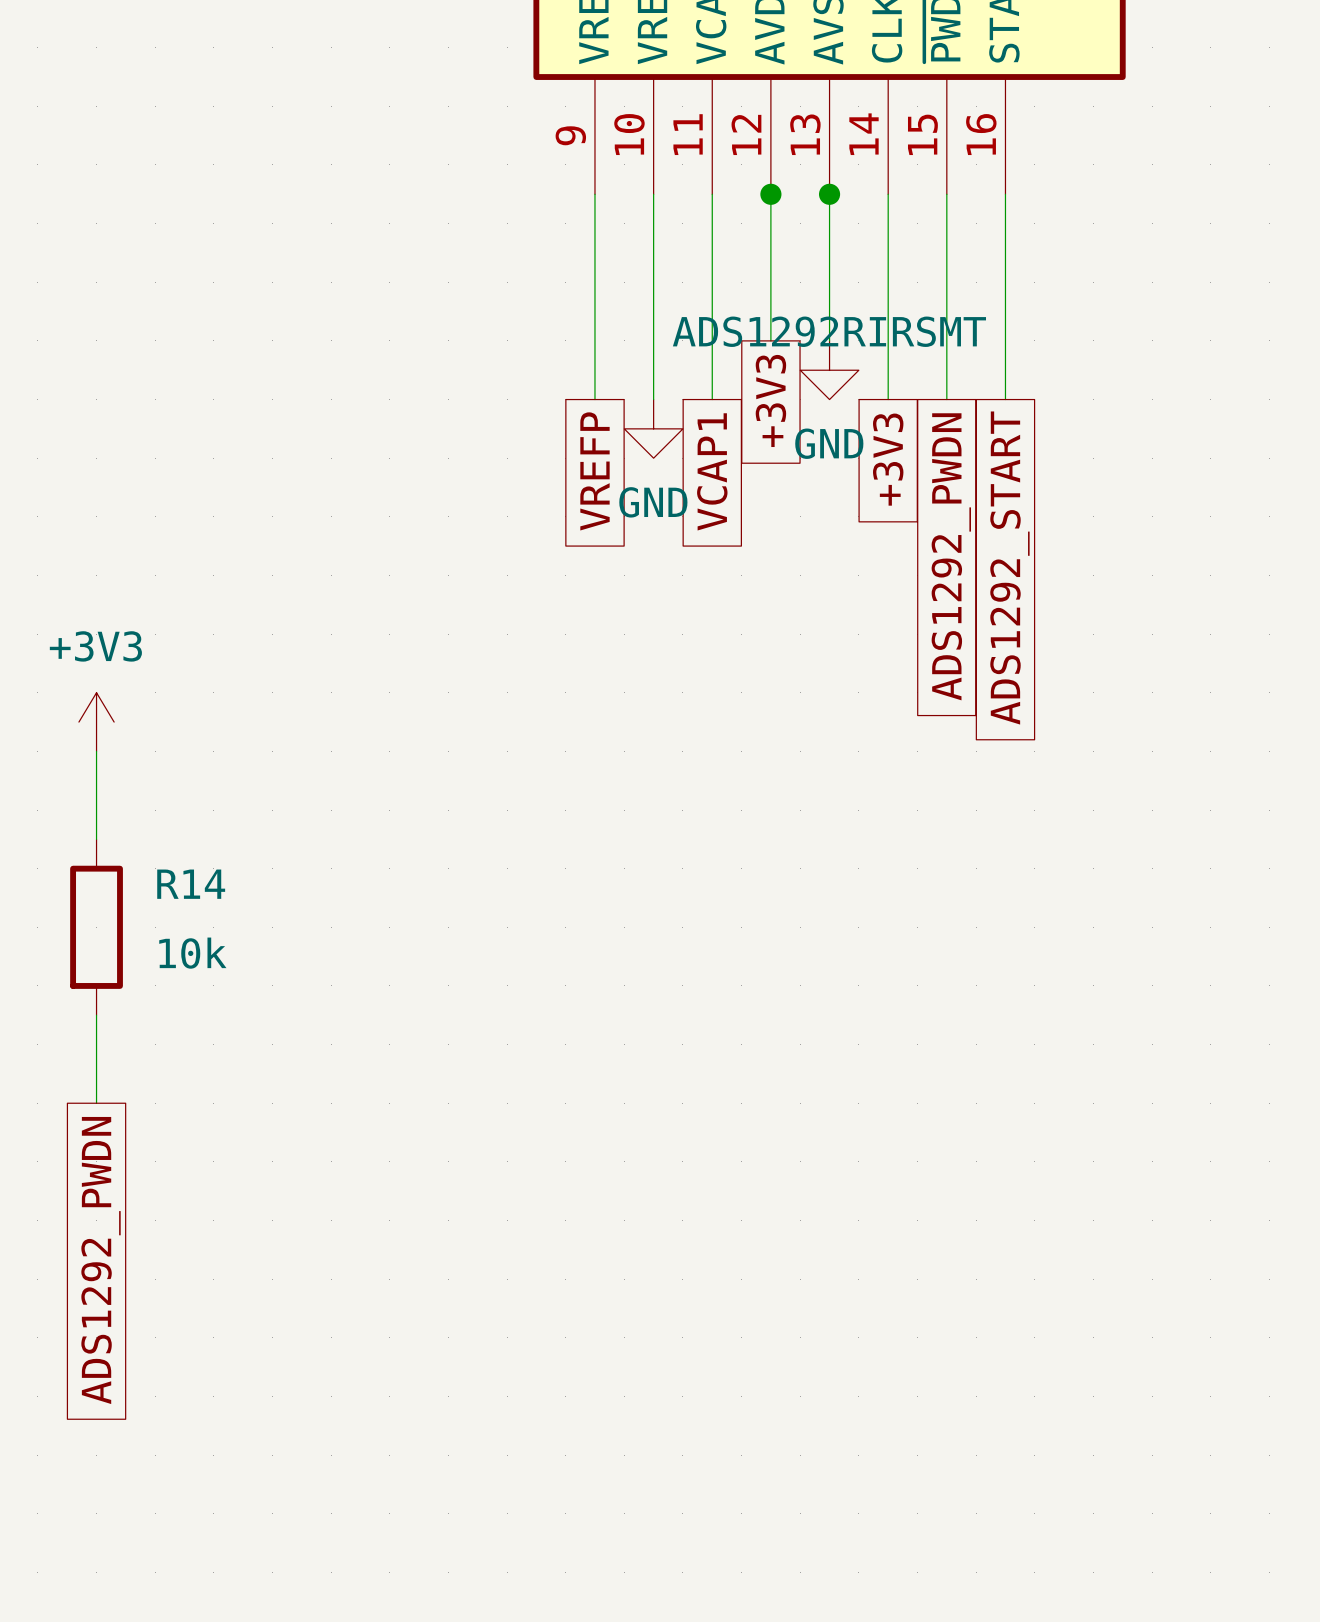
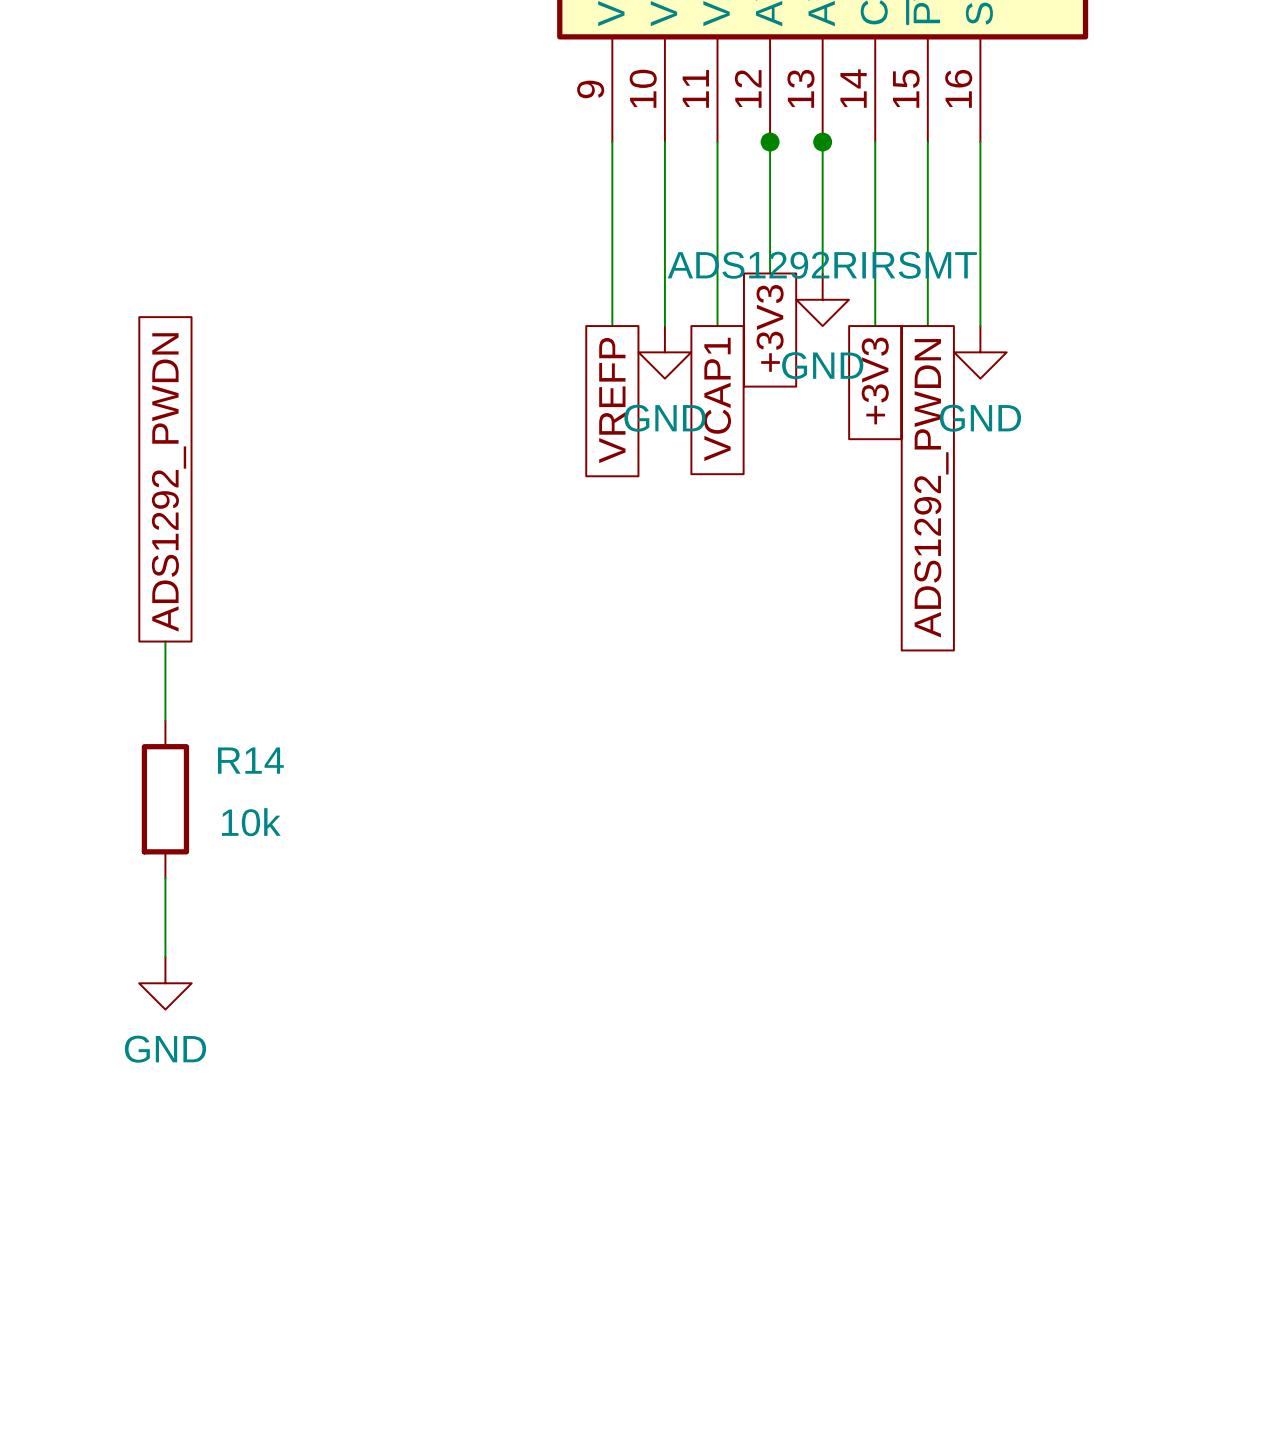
power symbol: none -> GND (980, 352)
global label: ADS1292_START (1009, 568) -> none
power symbol: +3V3 (96, 722) -> none
power symbol: none -> GND (165, 983)
global label rotation: 0° (101, 1260) -> 180° (169, 482)
global label position: ADS1292_PWDN (101, 1260) -> ADS1292_PWDN (169, 482)

